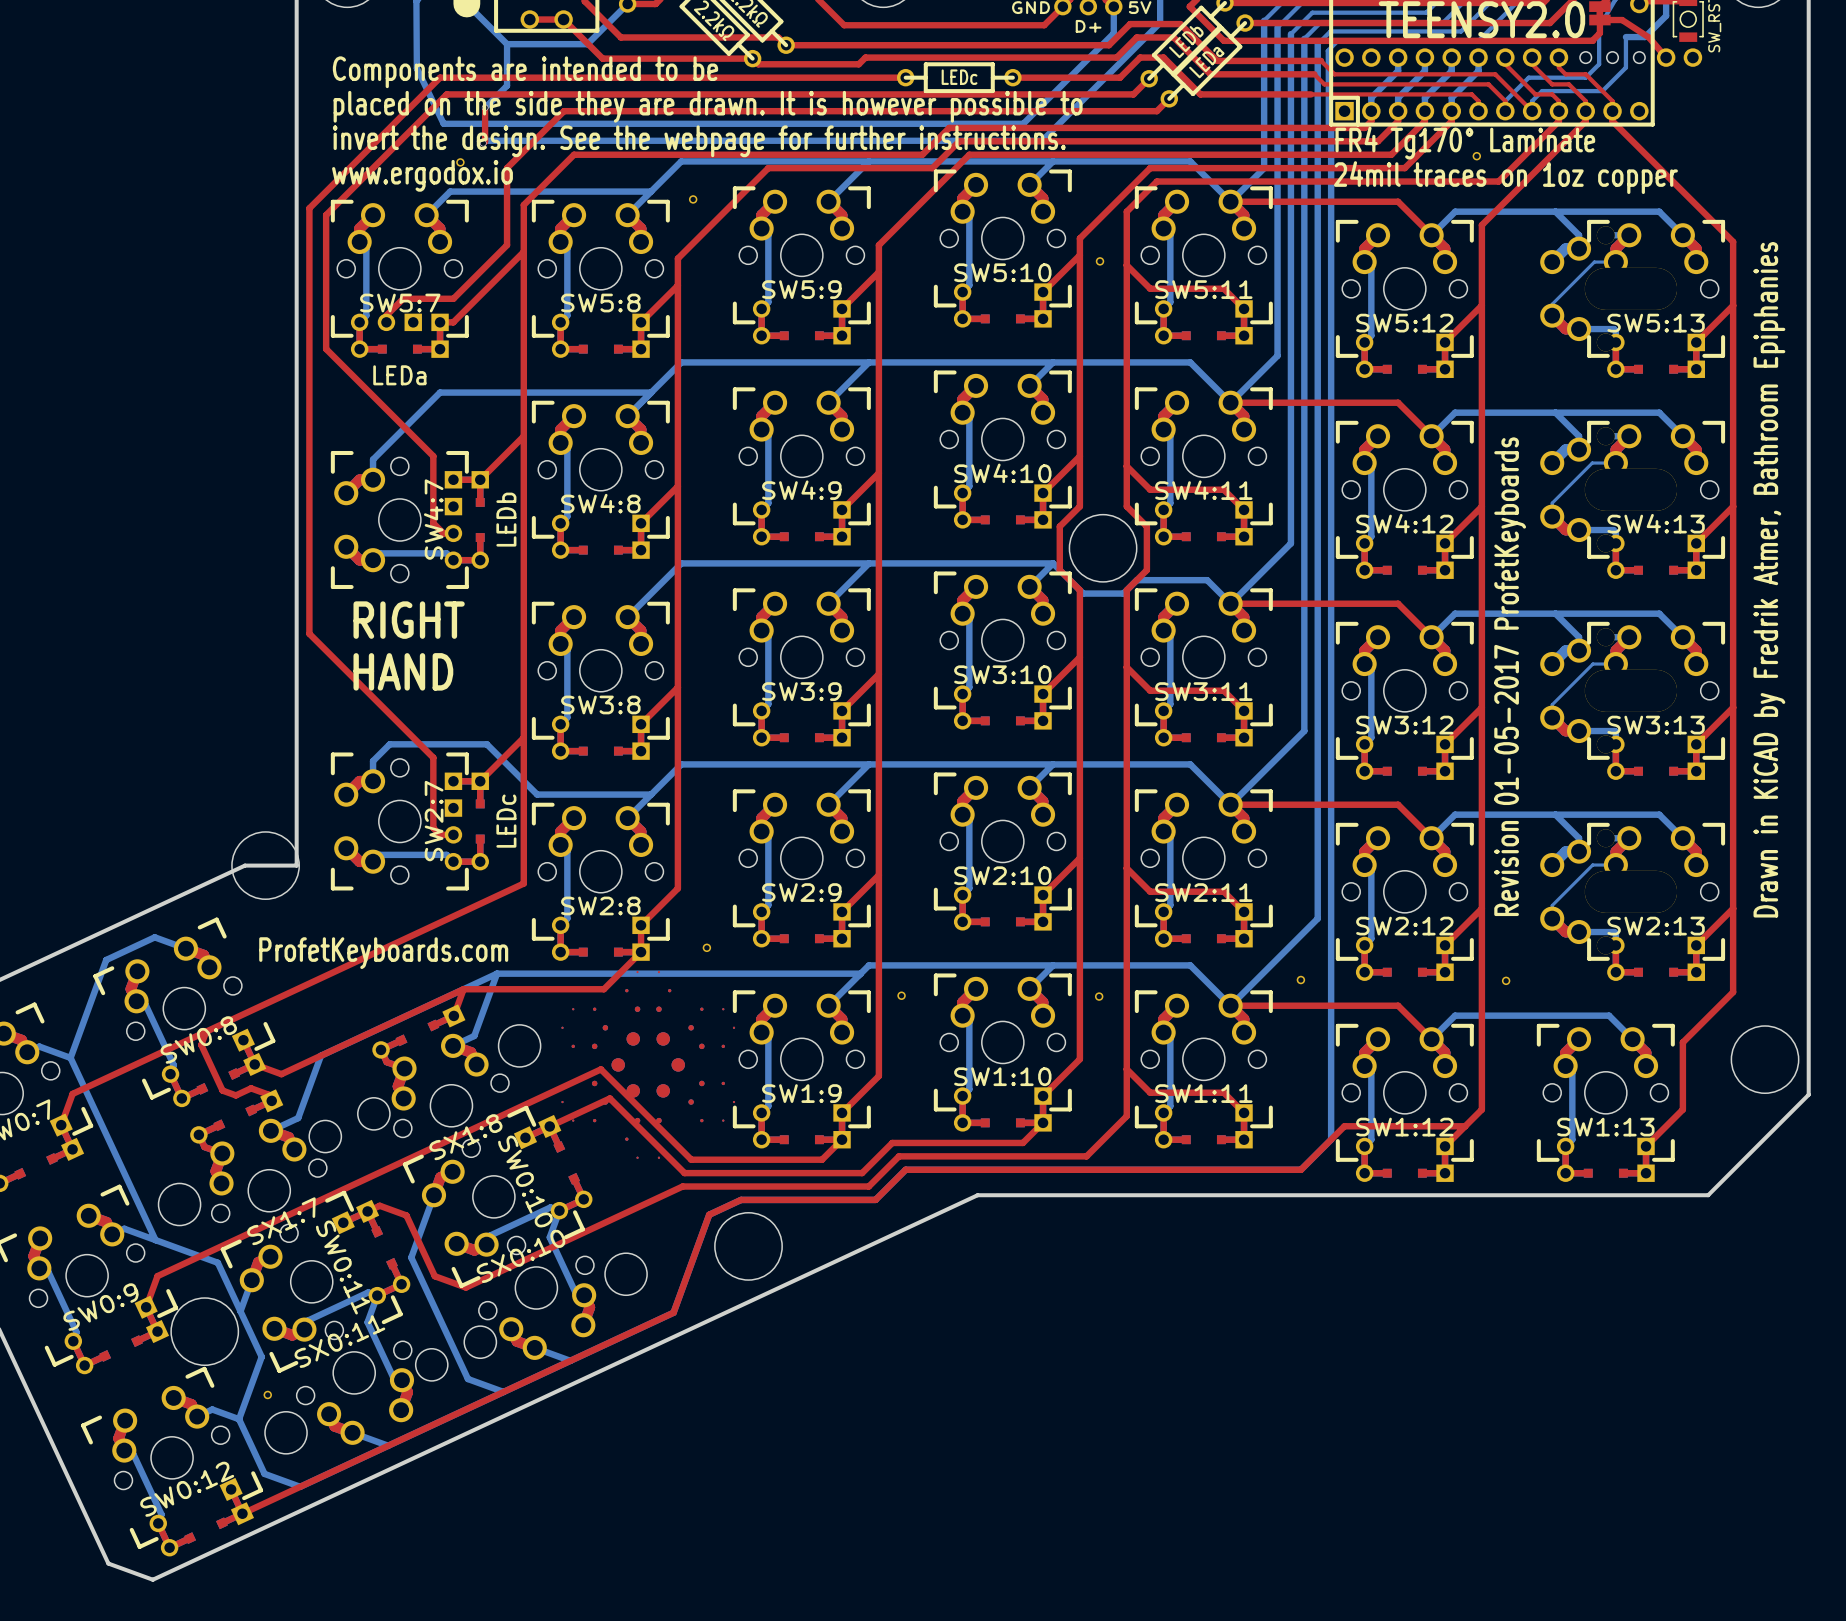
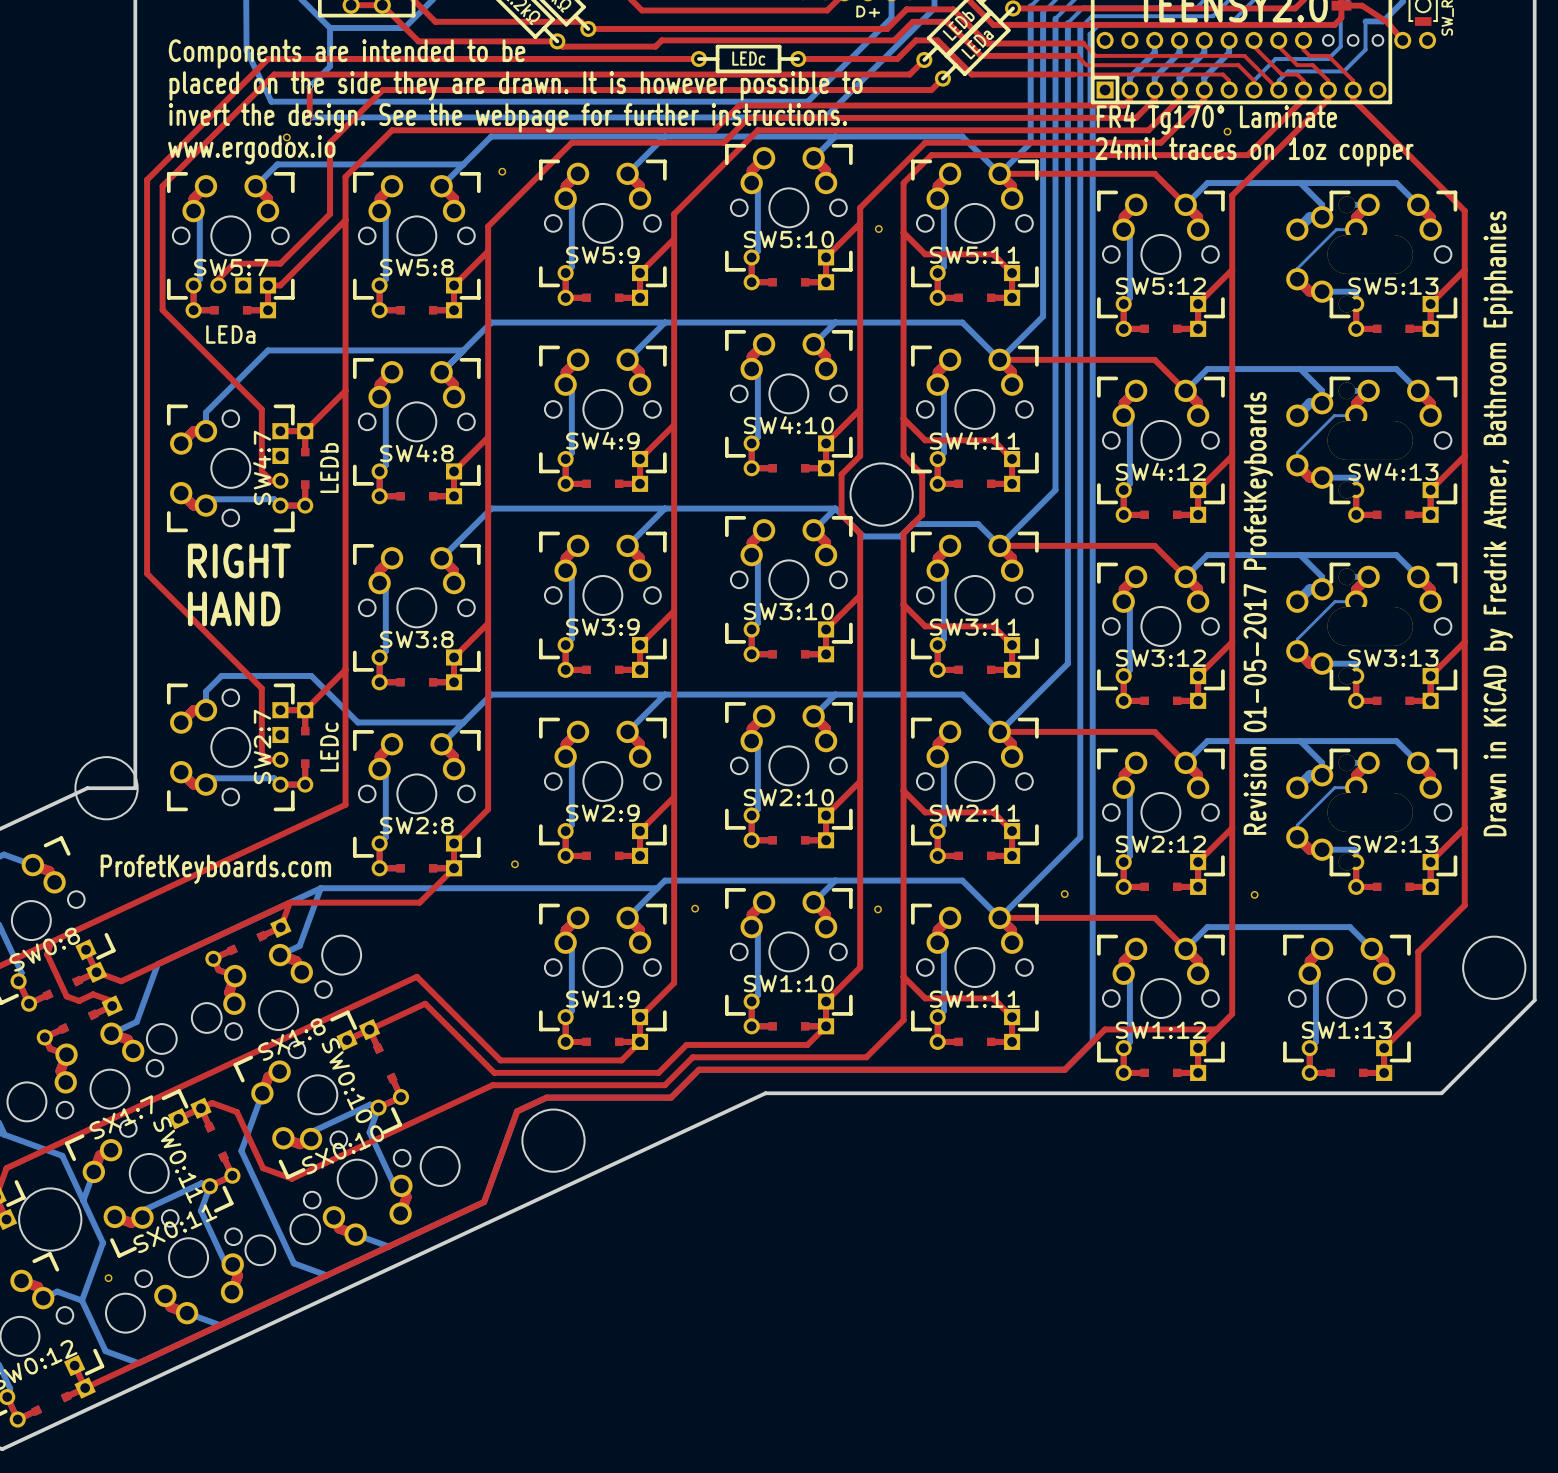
part: (648, 1064) -> none

